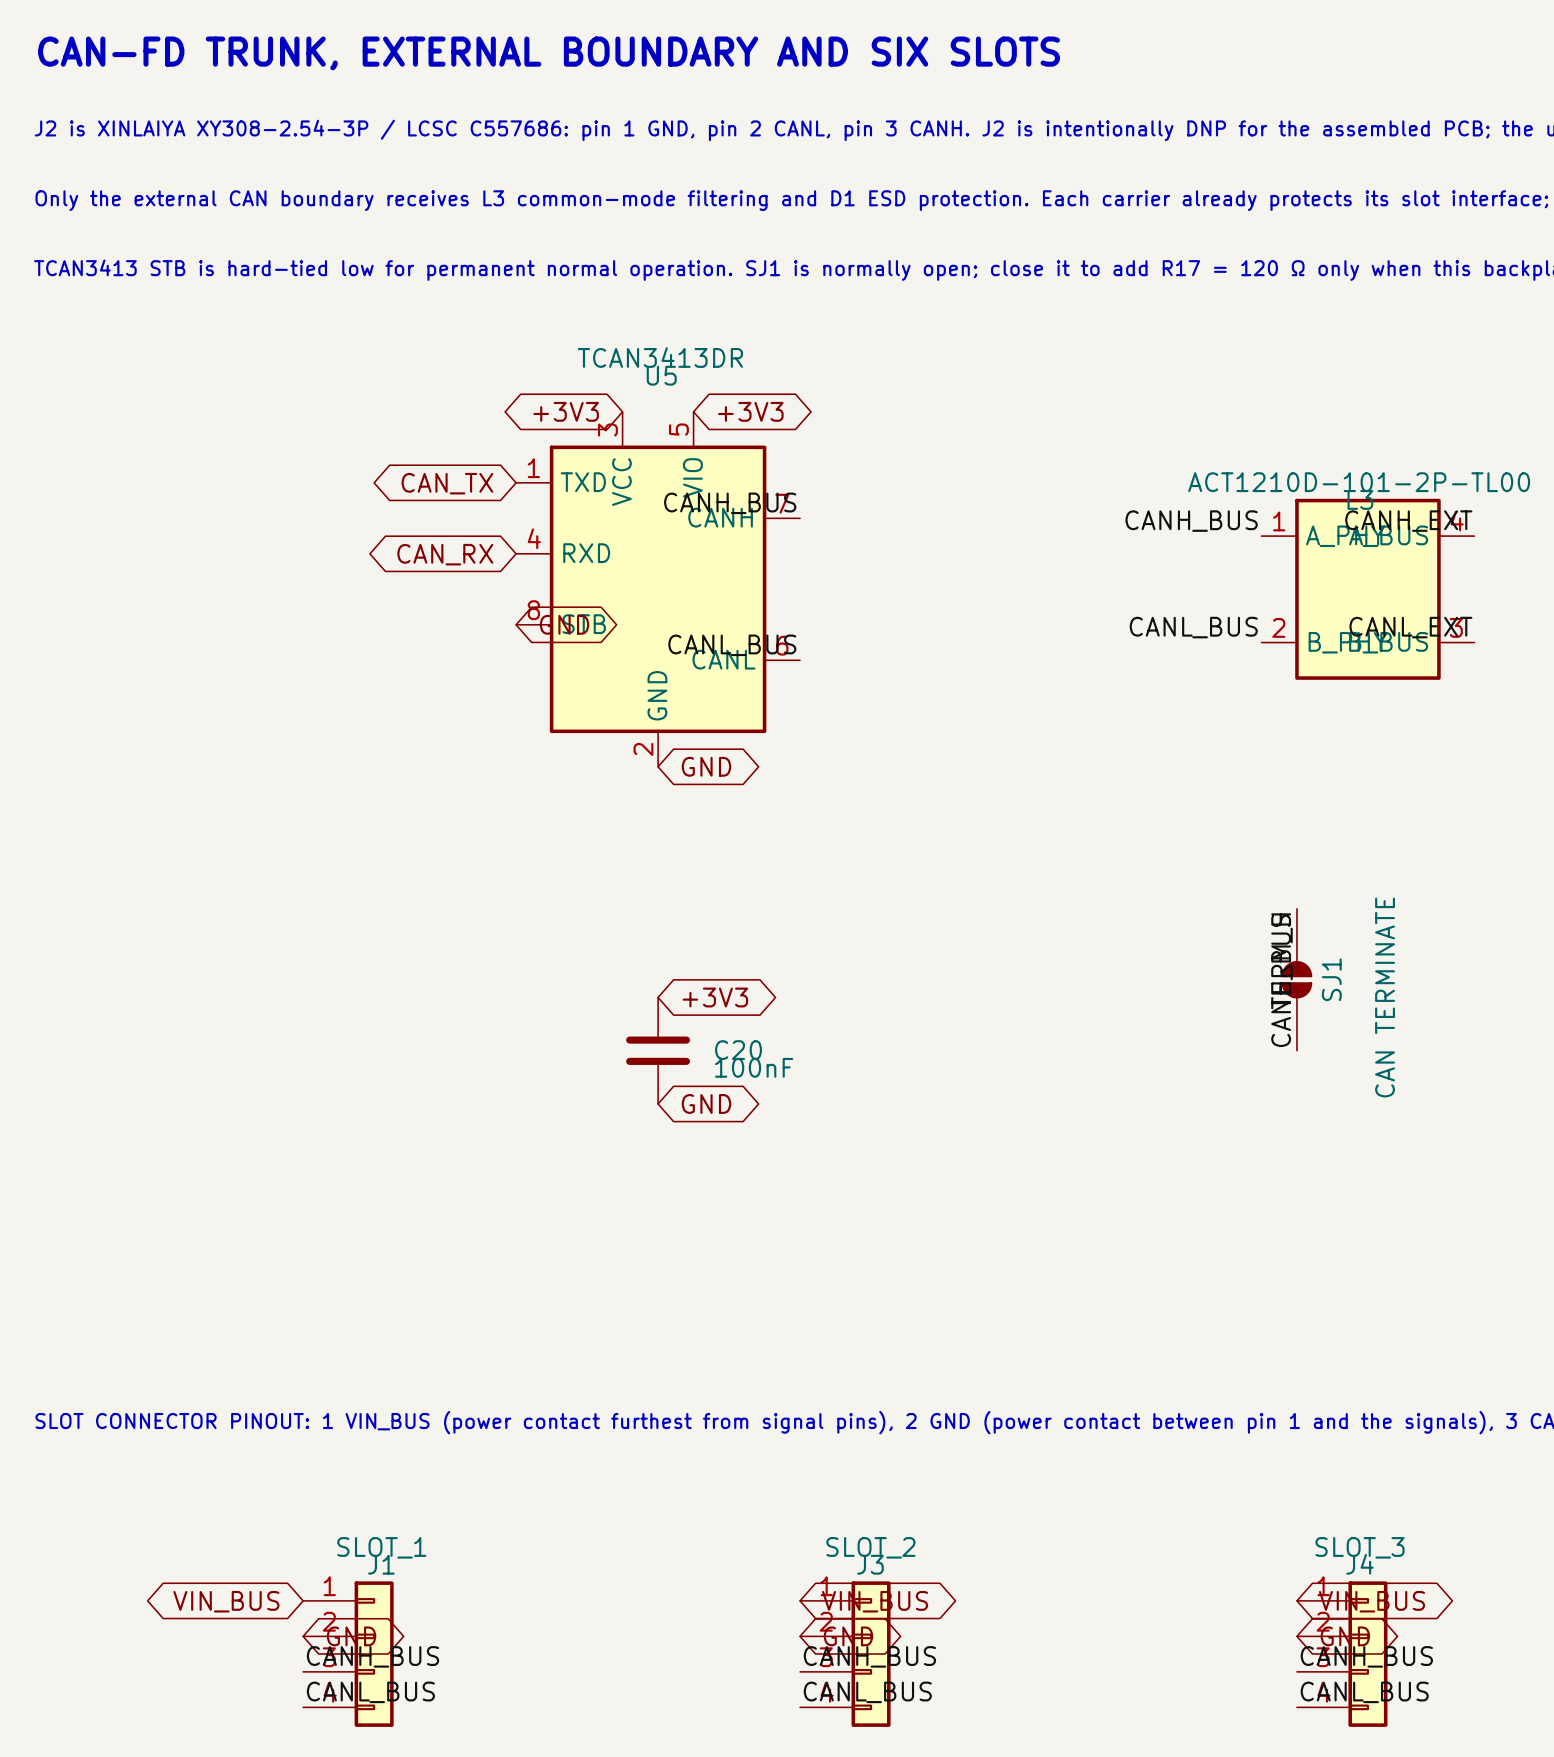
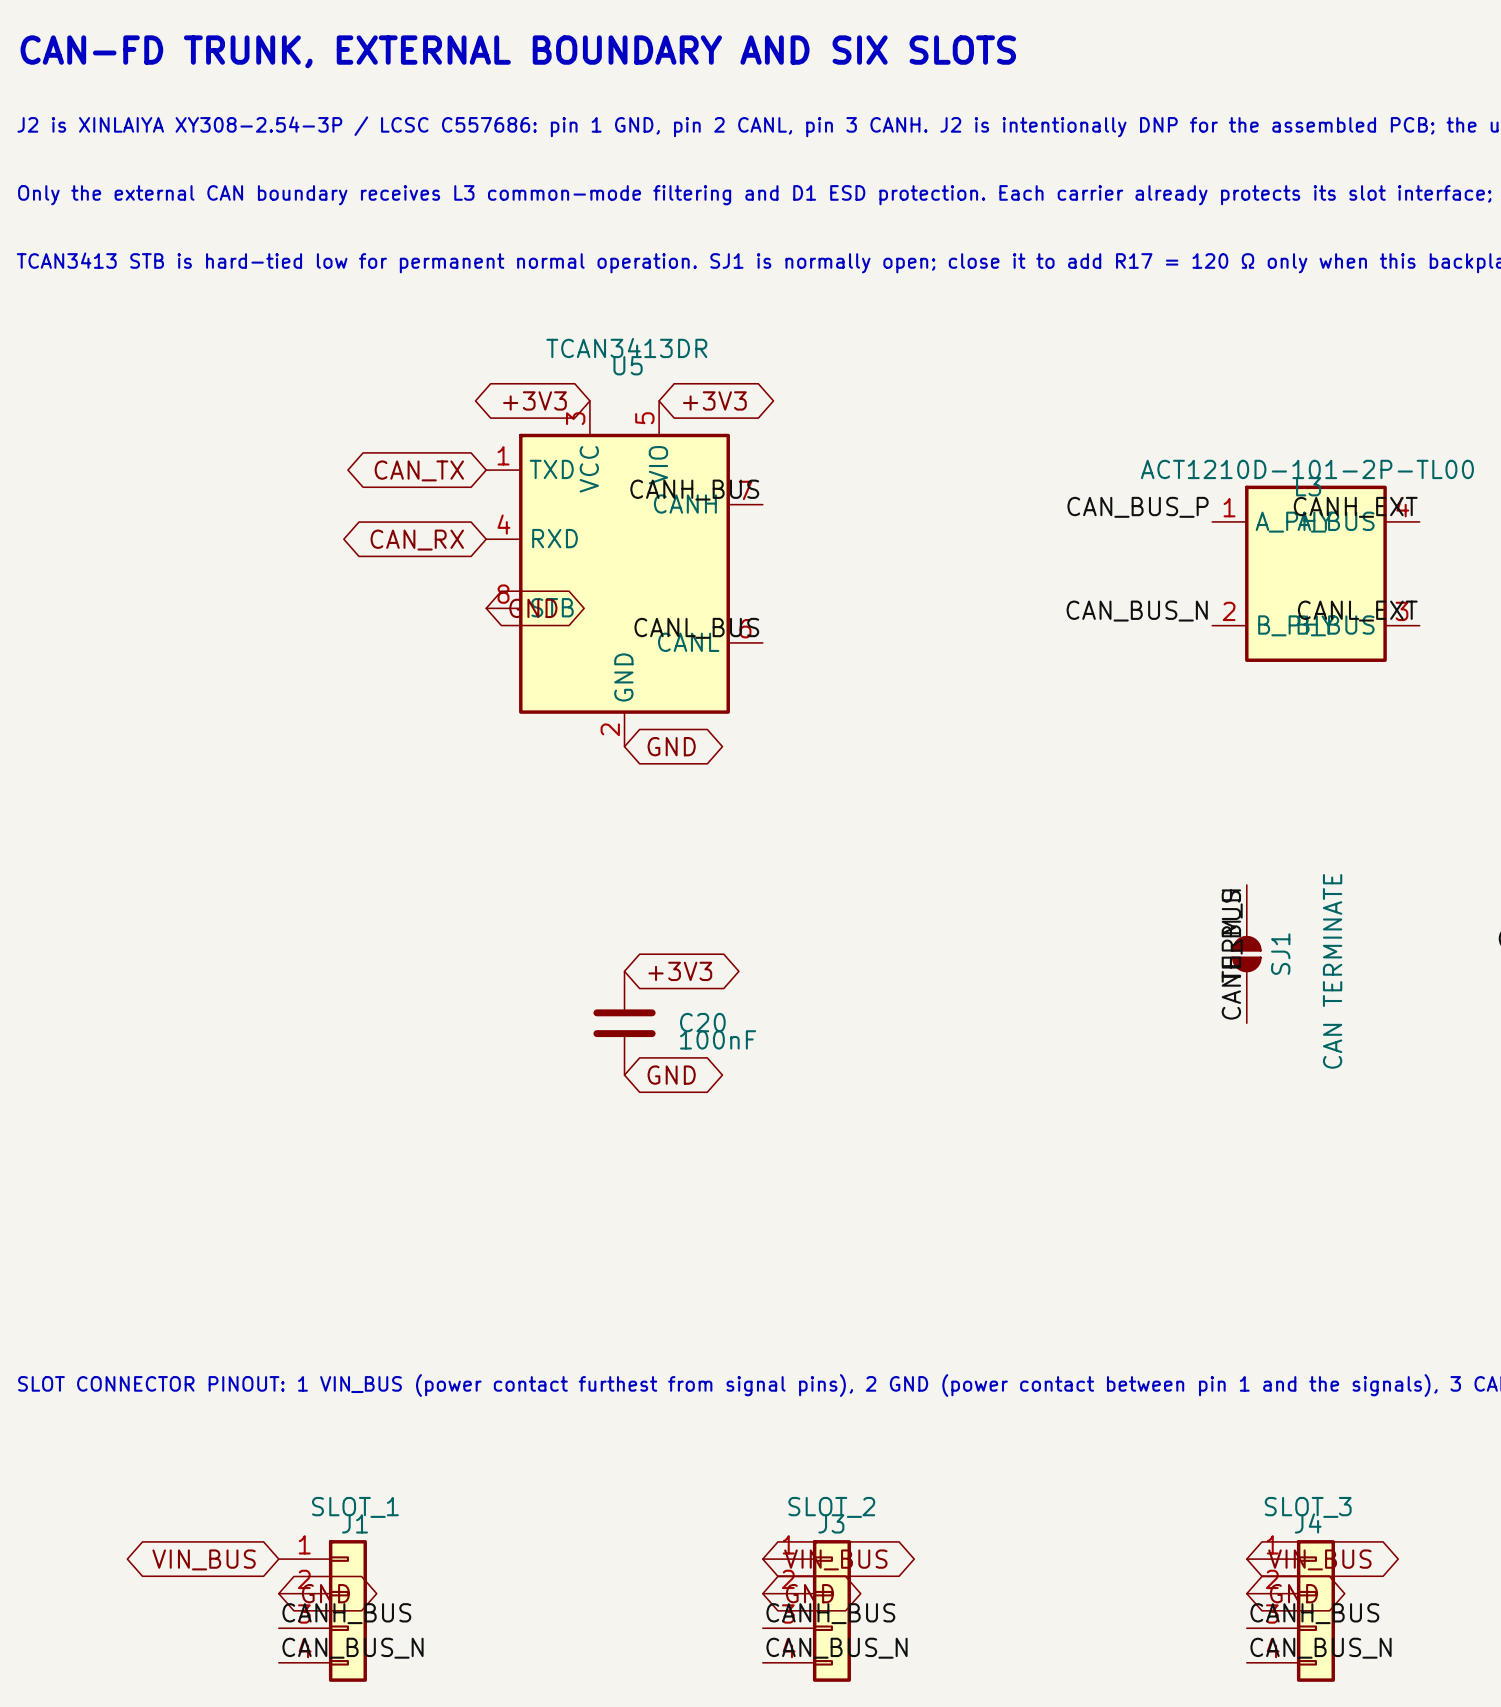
label: CANH_BUS (1191, 521) -> CAN_BUS_P (1138, 507)
label: CANL_BUS (1193, 627) -> CAN_BUS_N (1137, 611)
label: CANL_BUS (370, 1692) -> CAN_BUS_N (353, 1648)
label: CANL_BUS (867, 1692) -> CAN_BUS_N (837, 1648)
label: CANL_BUS (1364, 1692) -> CAN_BUS_N (1321, 1648)

